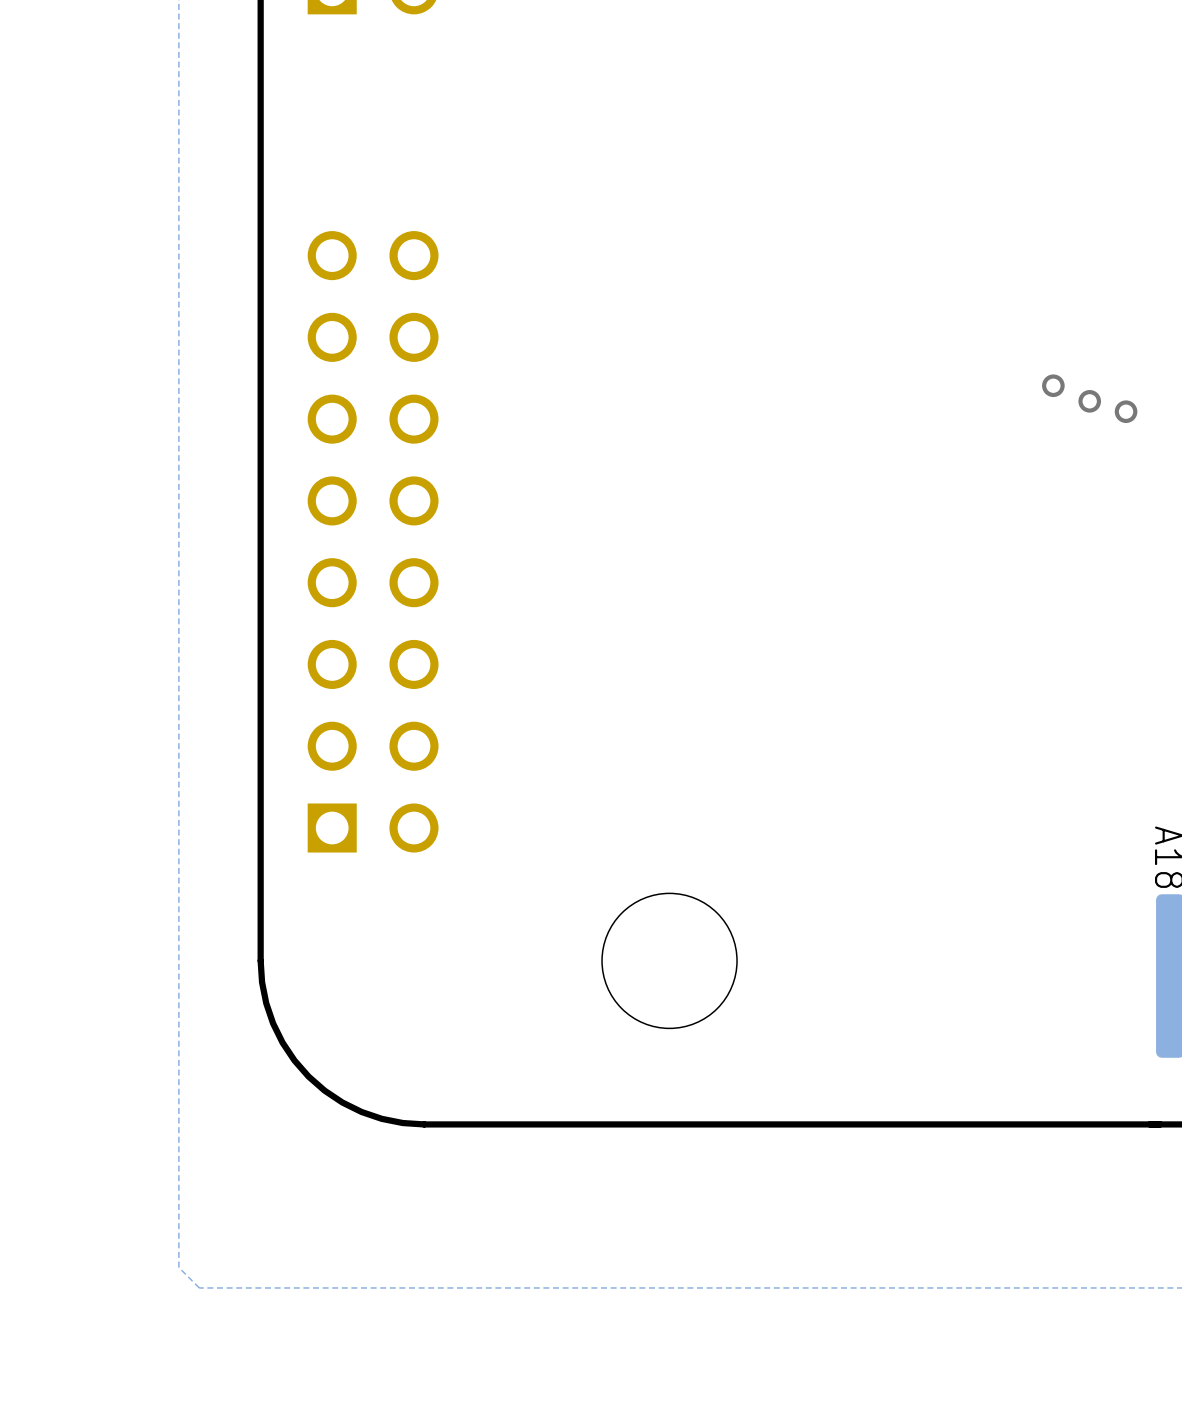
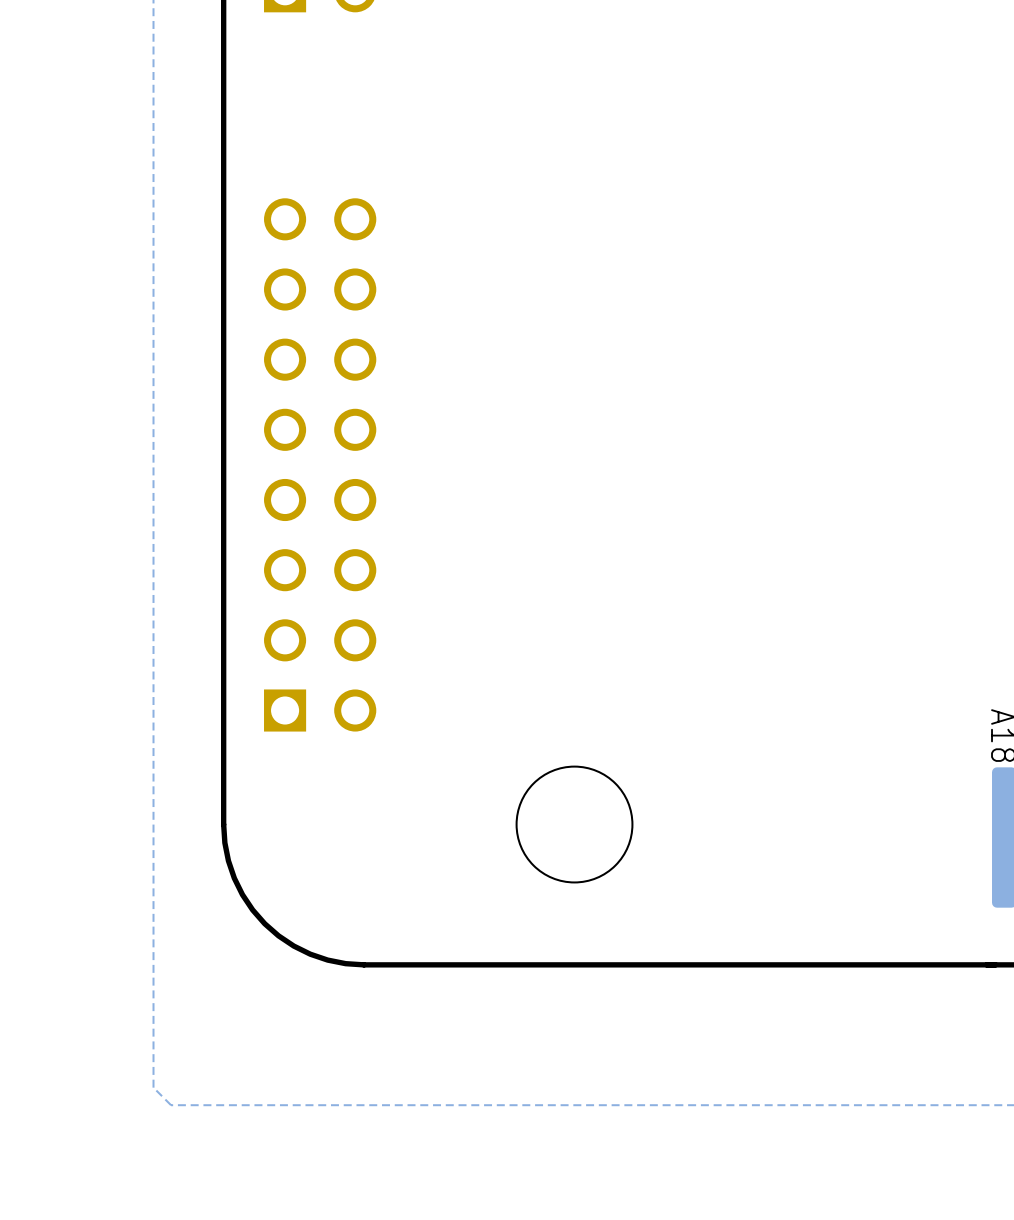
via: (1053, 385) -> none
via: (1089, 401) -> none
via: (1126, 411) -> none

